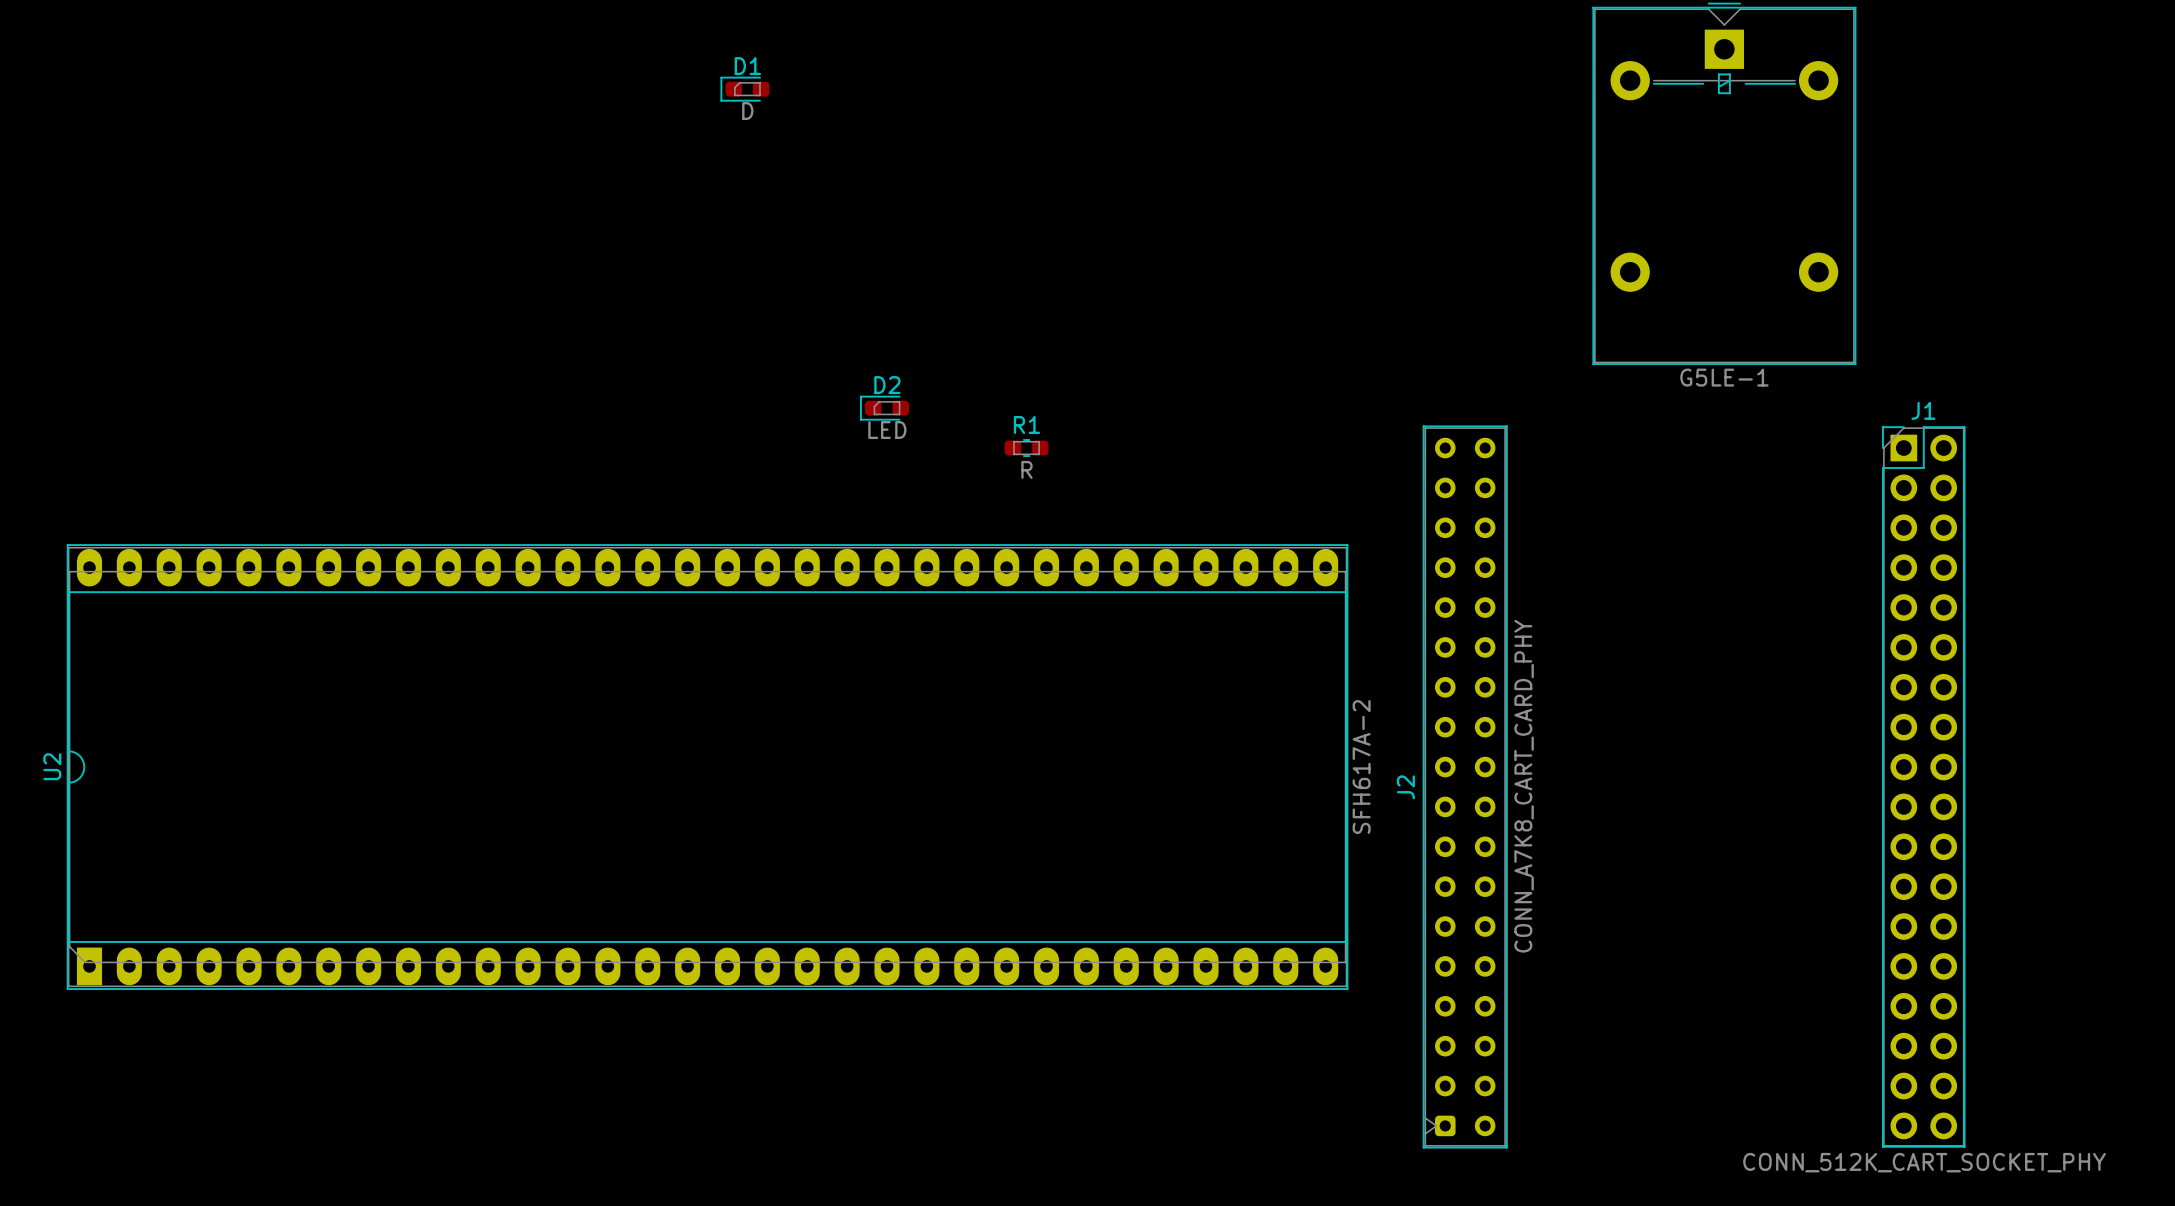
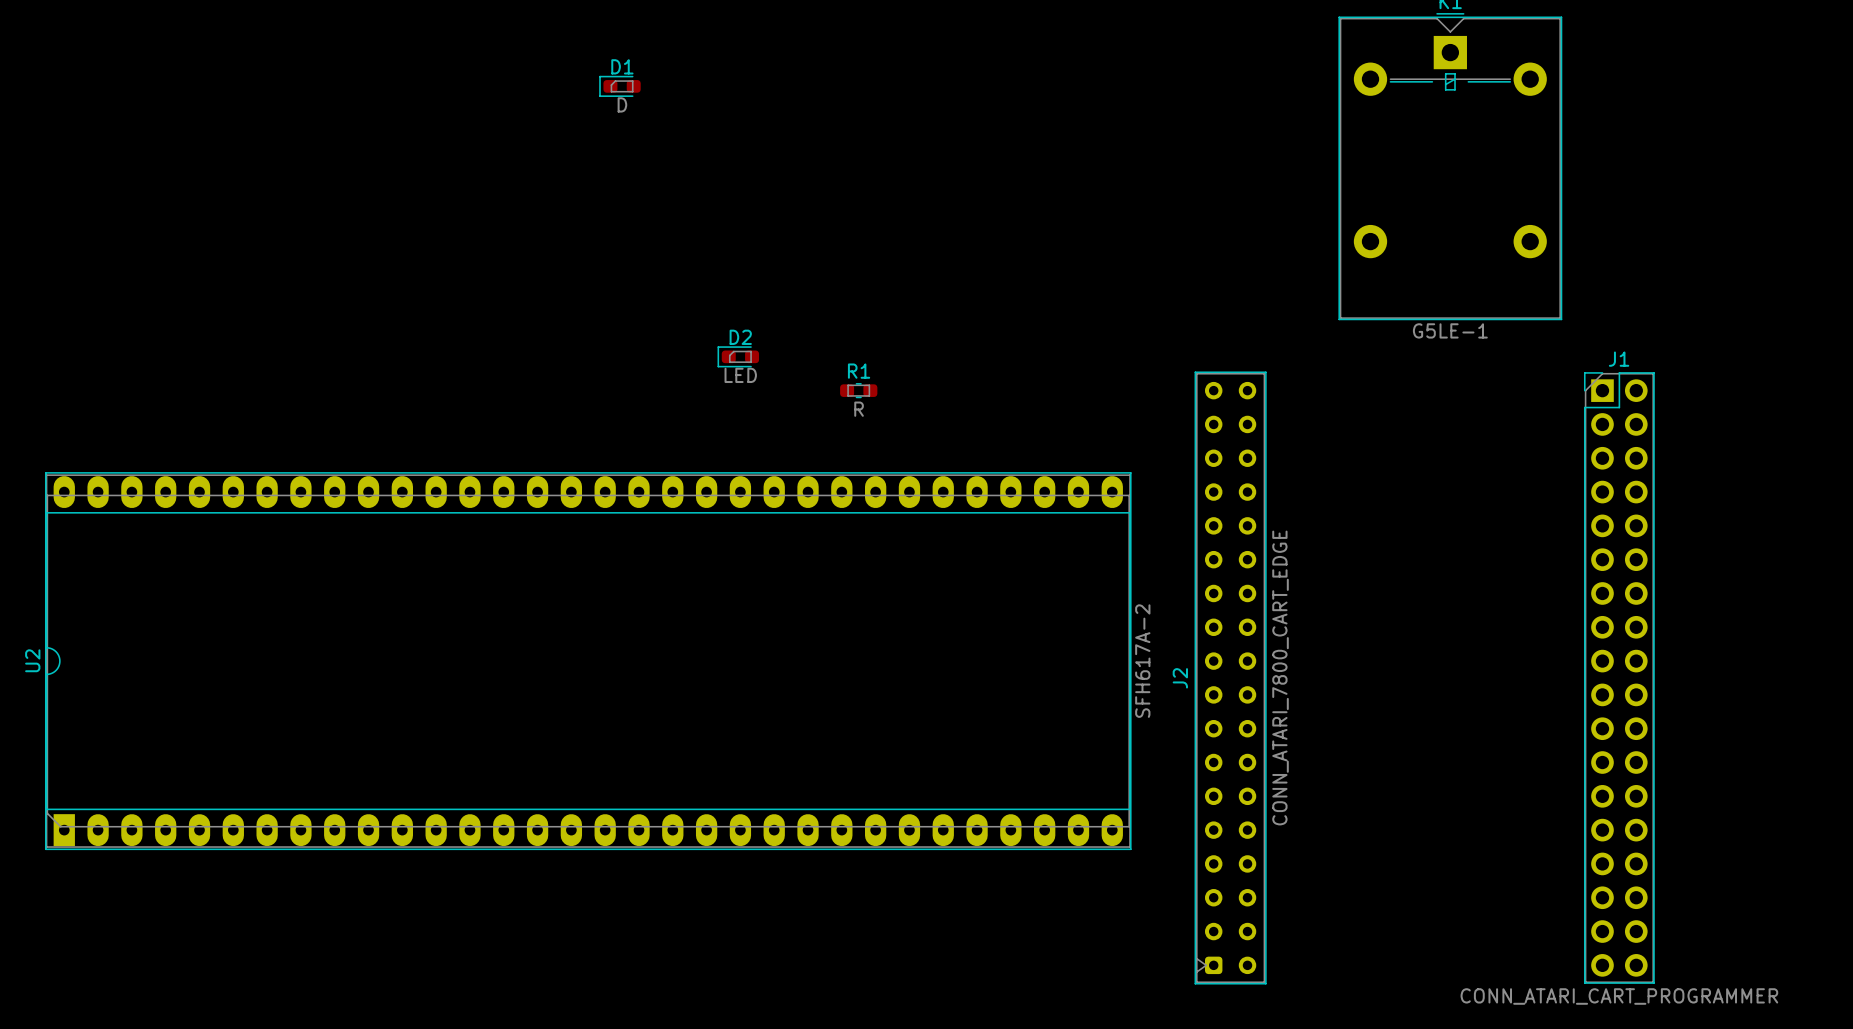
J2 value: CONN_A7K8_CART_CARD_PHY (1524, 786) -> CONN_ATARI_7800_CART_EDGE (1280, 678)
J1 value: CONN_512K_CART_SOCKET_PHY (1924, 1162) -> CONN_ATARI_CART_PROGRAMMER (1619, 996)

